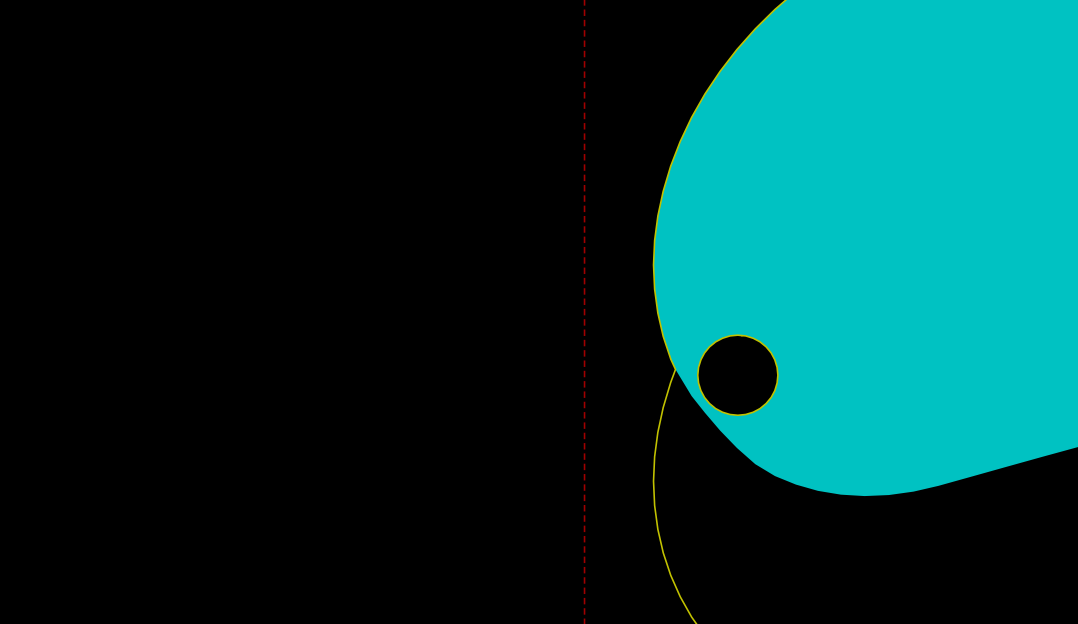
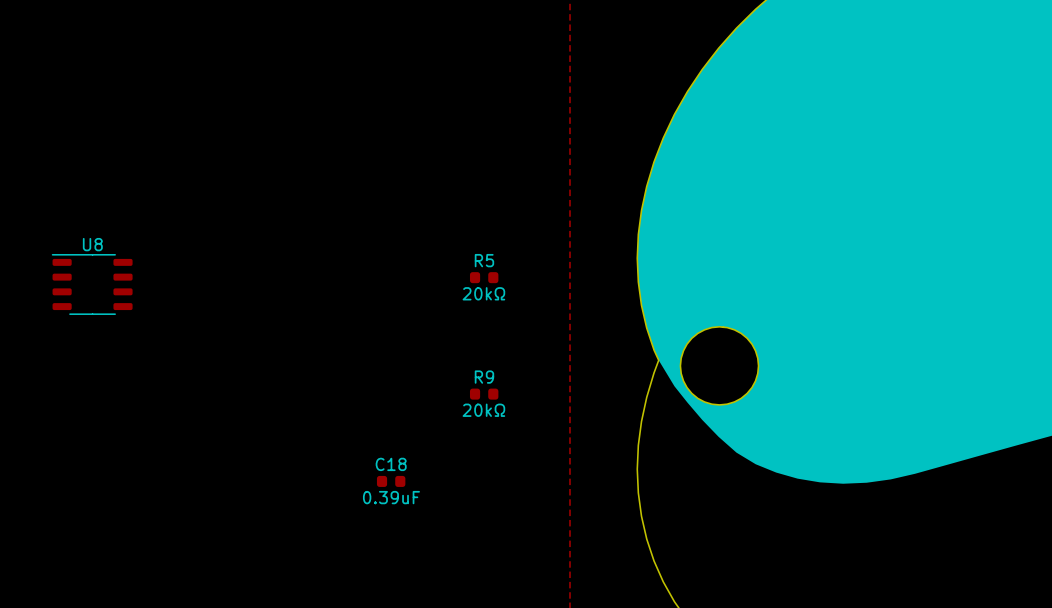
R5: none -> 20kΩ (484, 277)
U8: none -> (92, 284)
R9: none -> 20kΩ (484, 394)
C18: none -> 0.39uF (391, 481)

